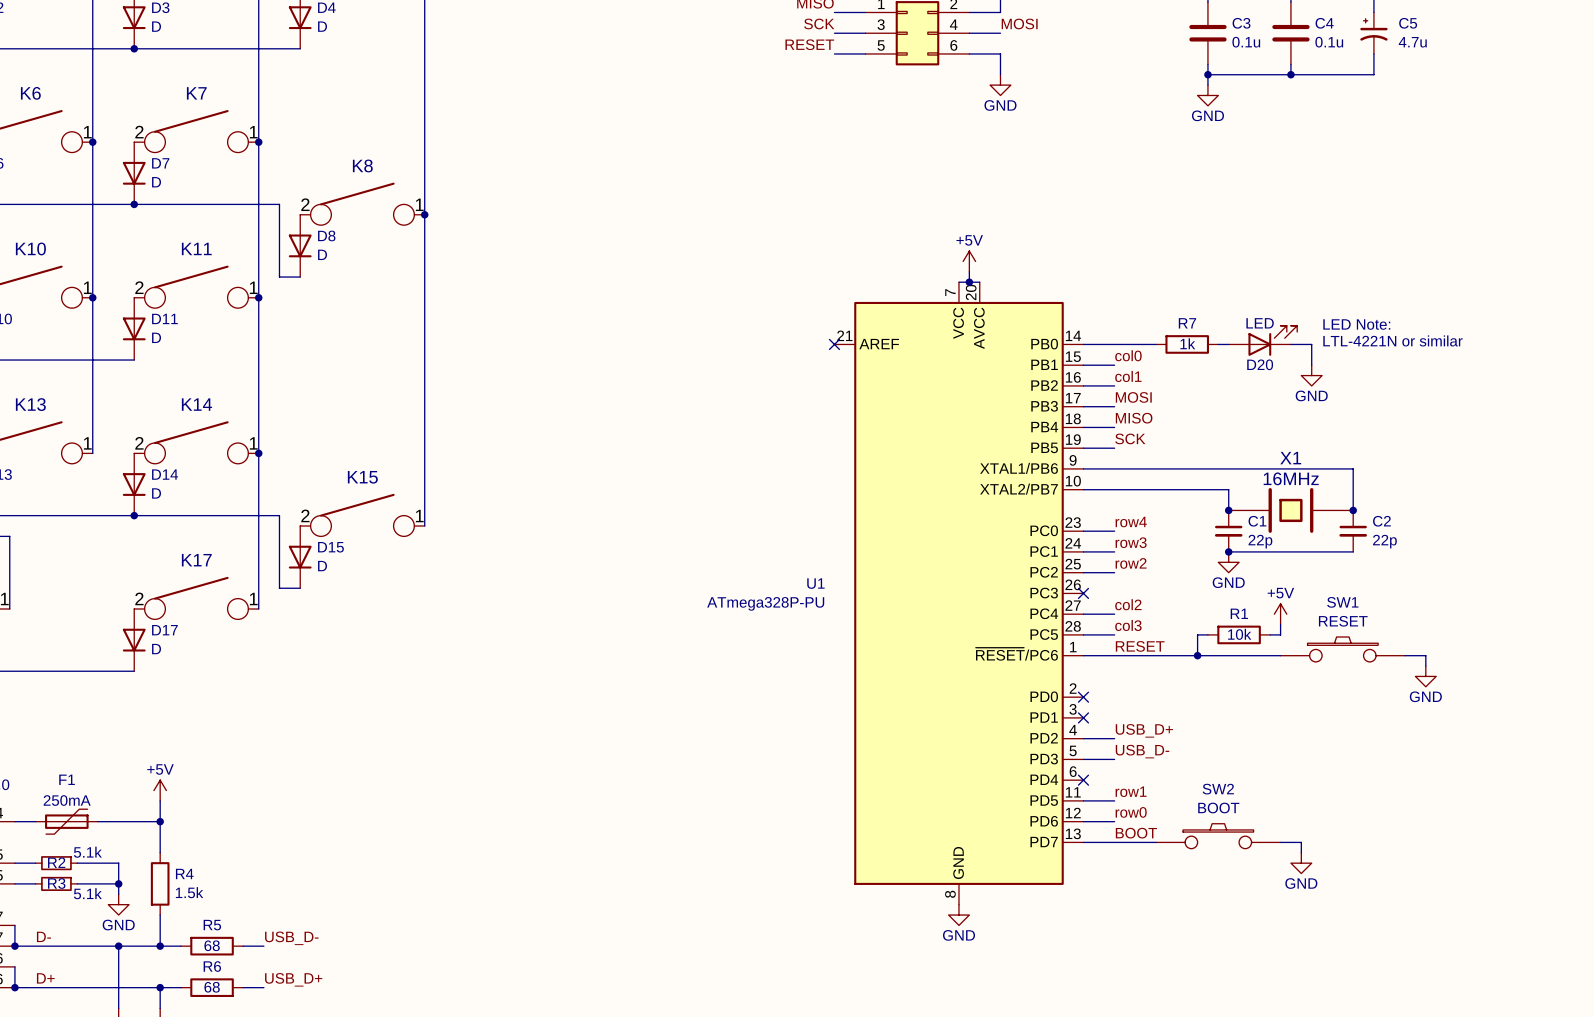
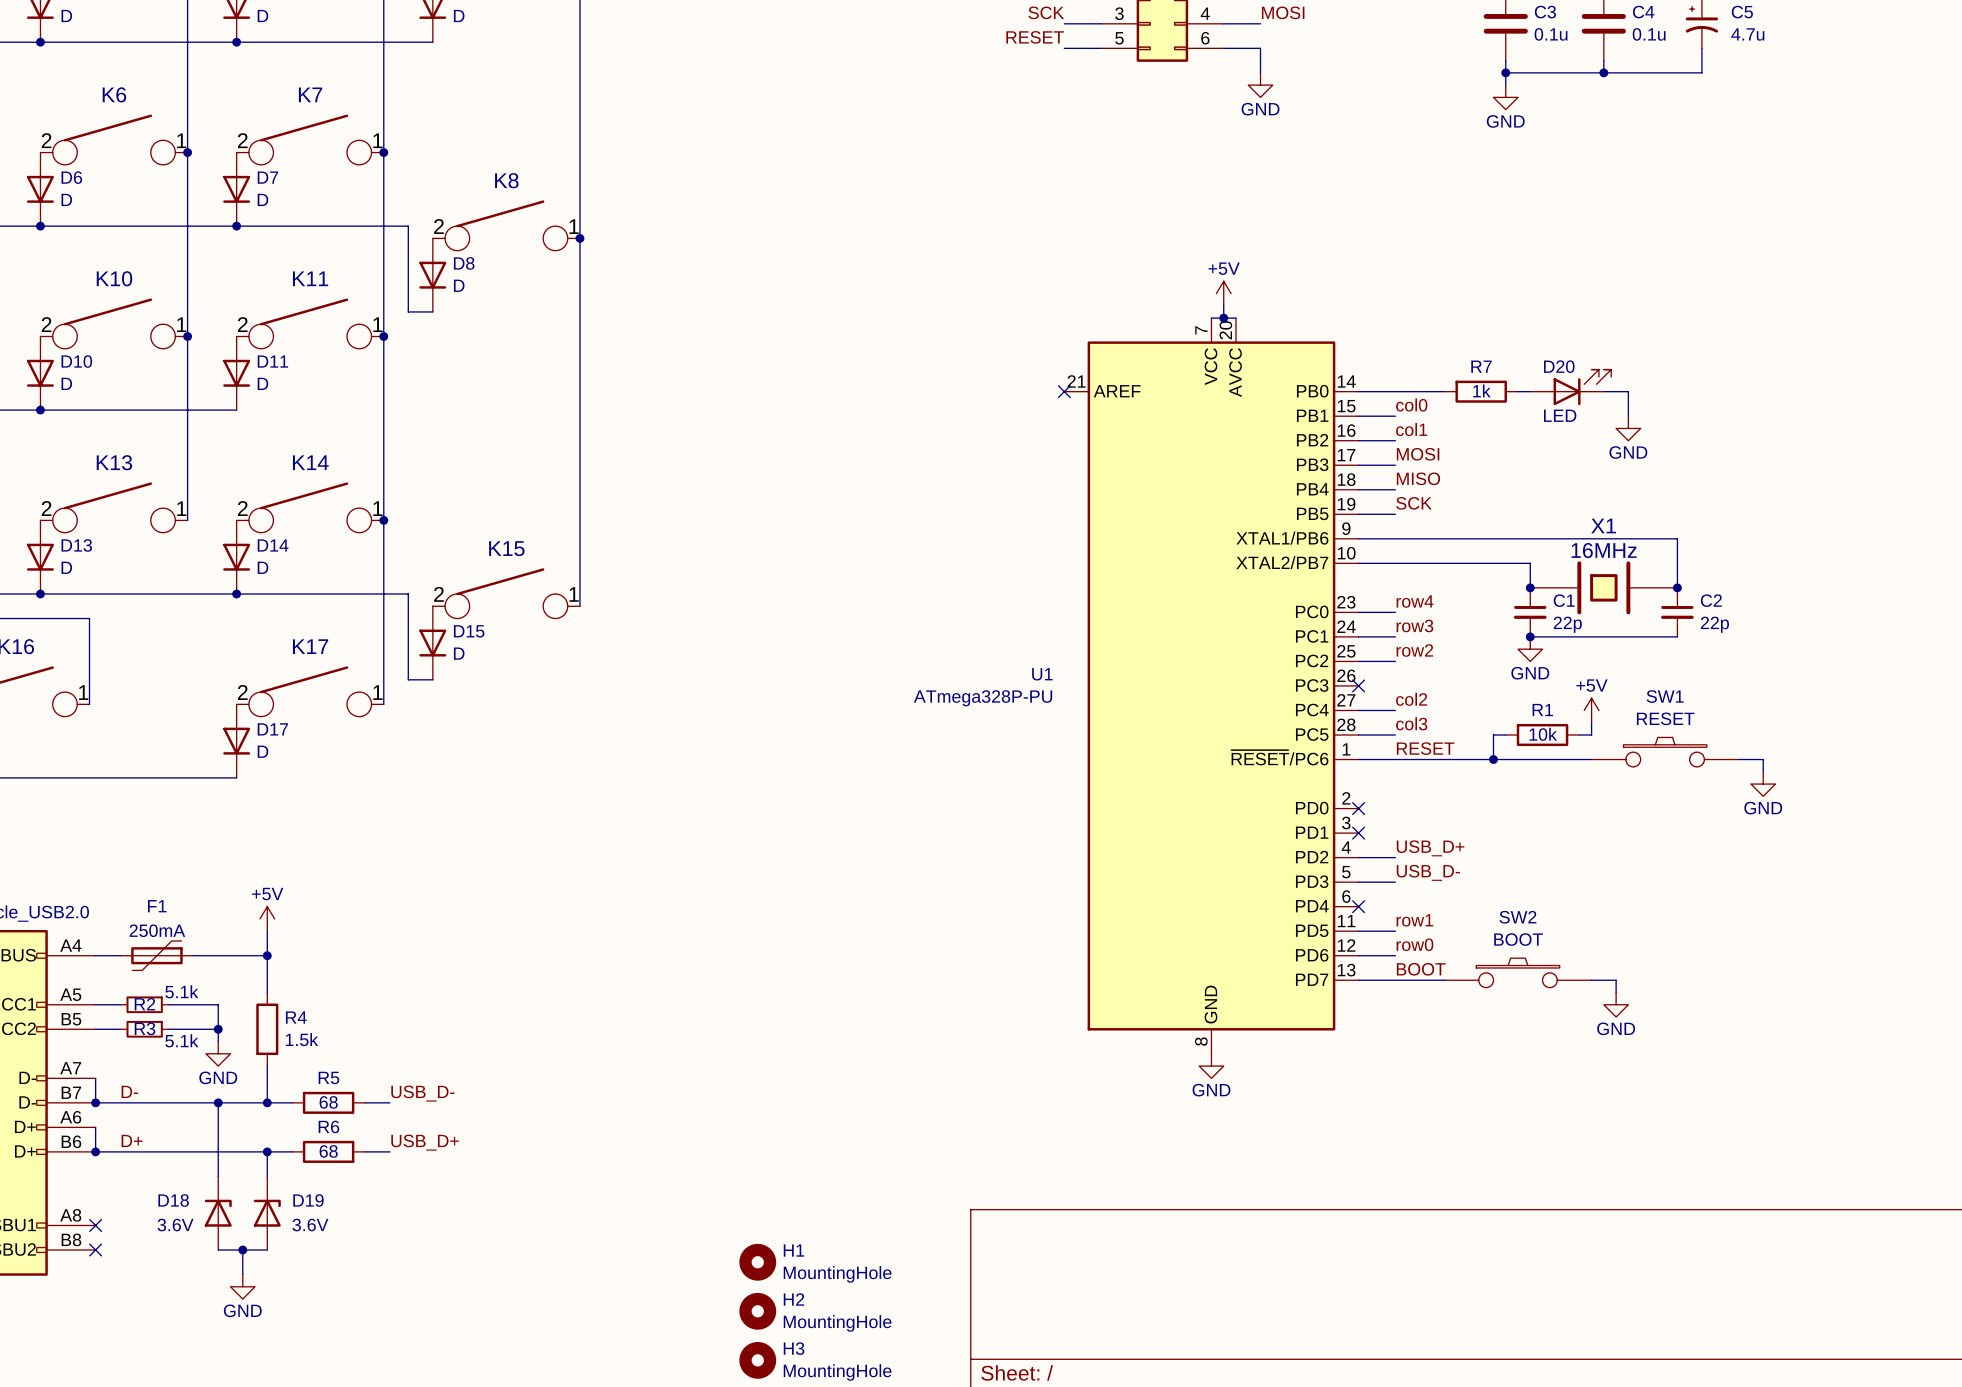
D20 value position: LED (1260, 323) -> LED (1560, 415)
text: LED Note: (1356, 324) -> none
text: LTL-4221N or similar (1392, 340) -> none
D20 name position: D20 (1260, 364) -> D20 (1559, 366)

